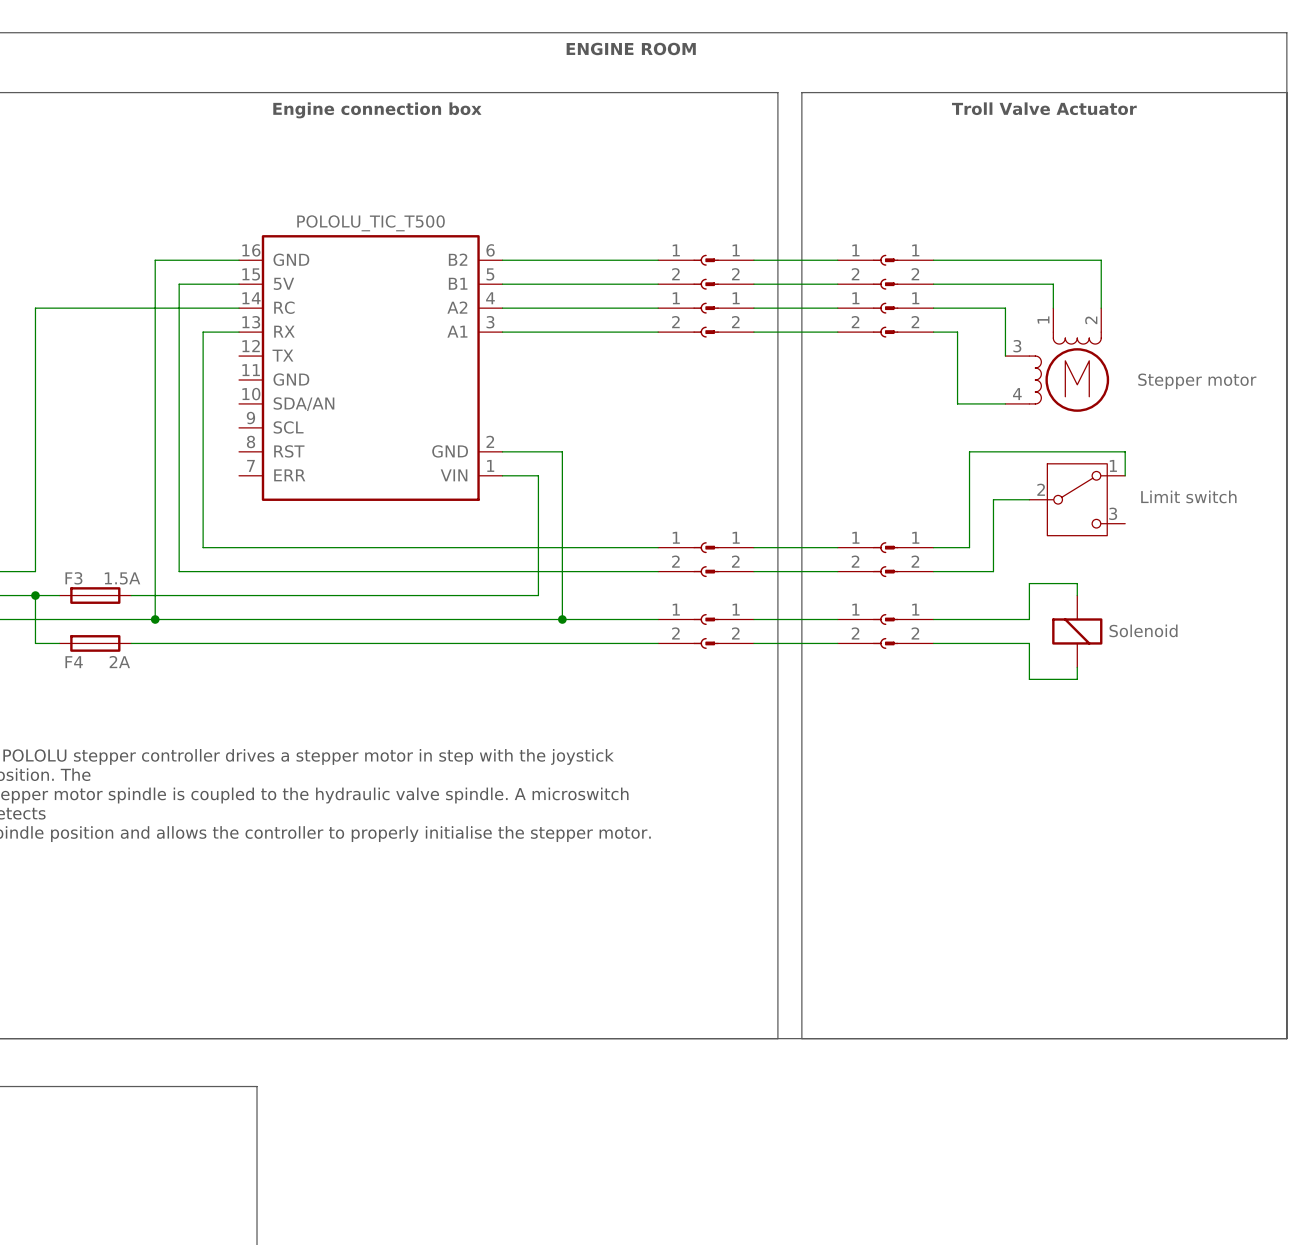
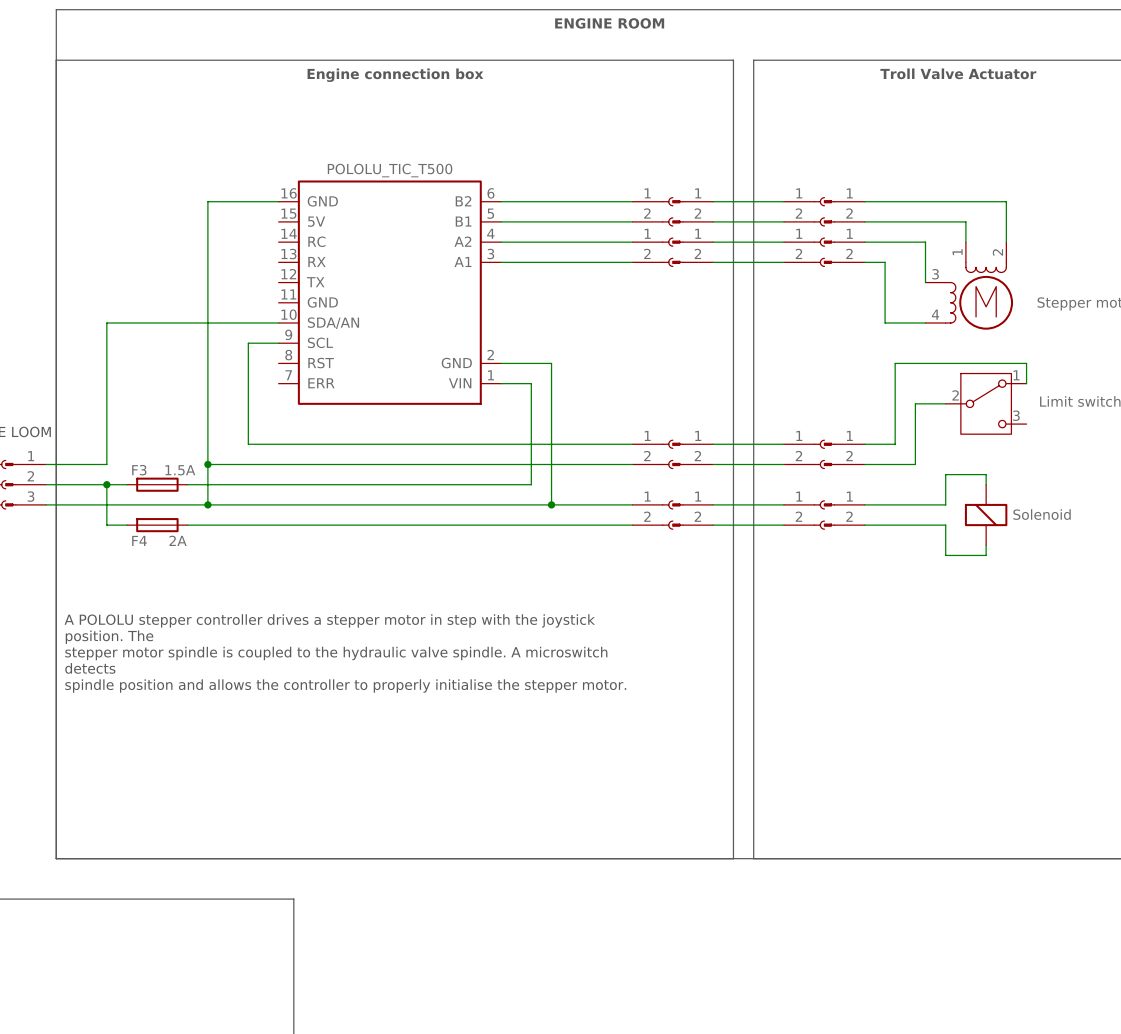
wire: (239, 284) (179, 284) (179, 571) -> (207, 464) (228, 464)
wire: (239, 308) (35, 308) (35, 403) -> (278, 323) (106, 323)
wire: (239, 332) (203, 332) (203, 427) -> (278, 343) (248, 343)
junction: none -> (207, 464)

